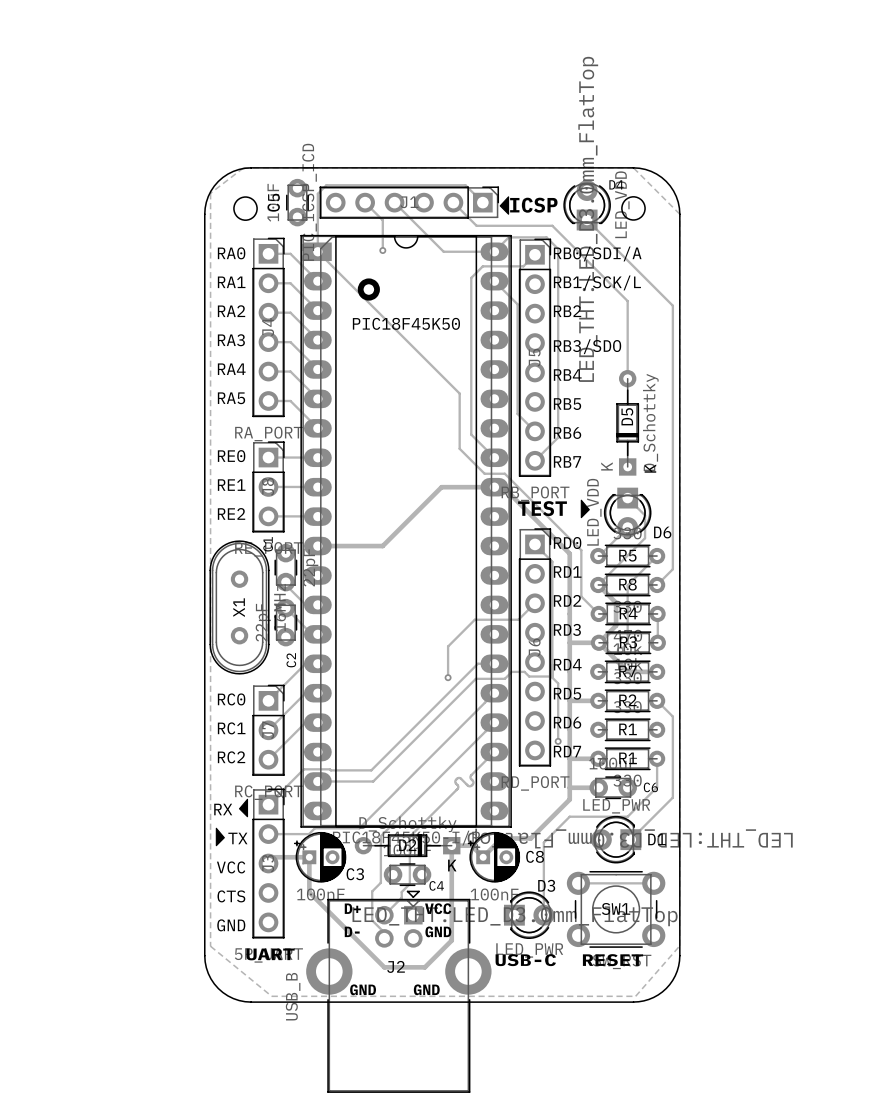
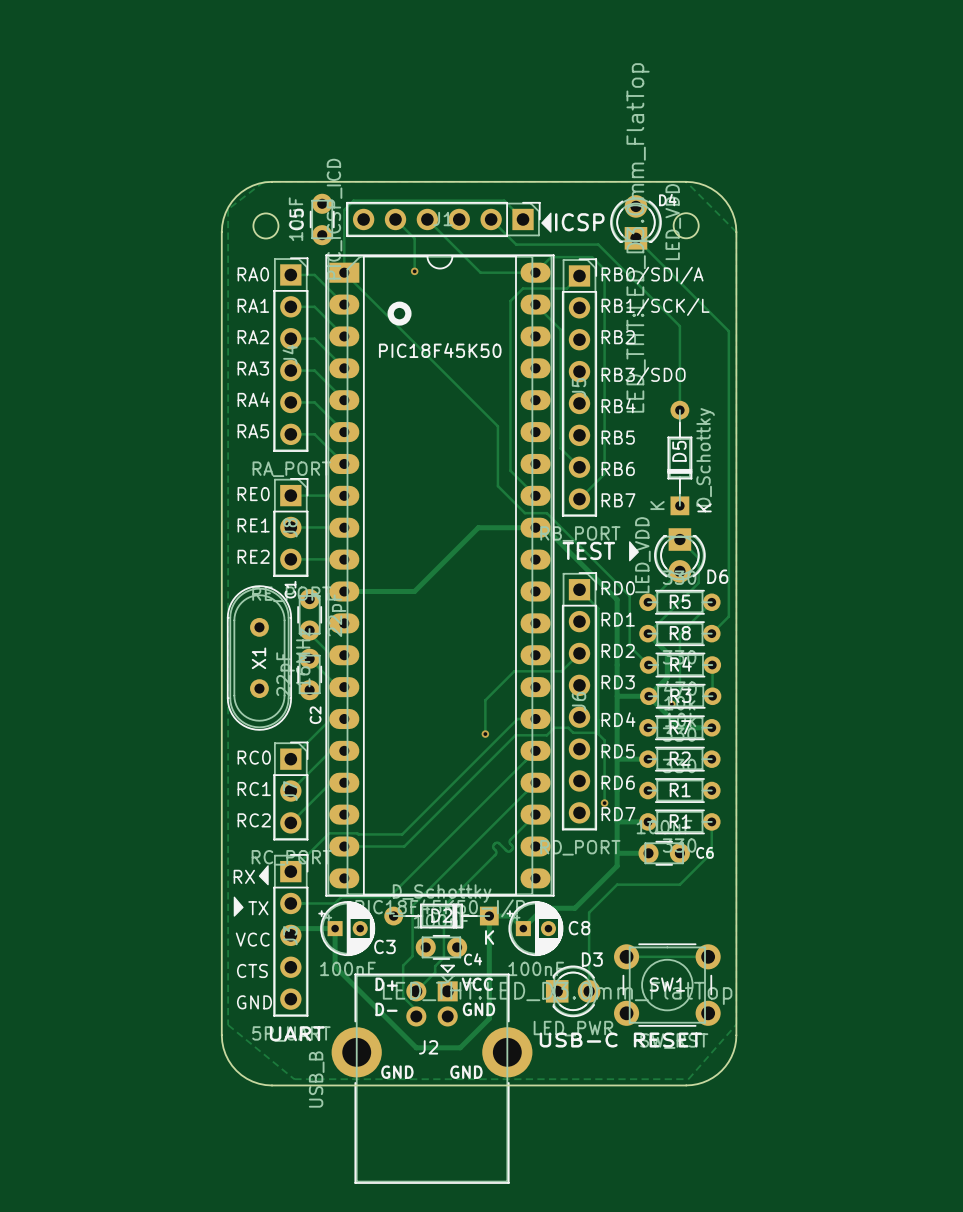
track: (657, 700) (672, 716) (672, 797) (630, 839) -> none
D1: LED_PWR (616, 839) -> none

